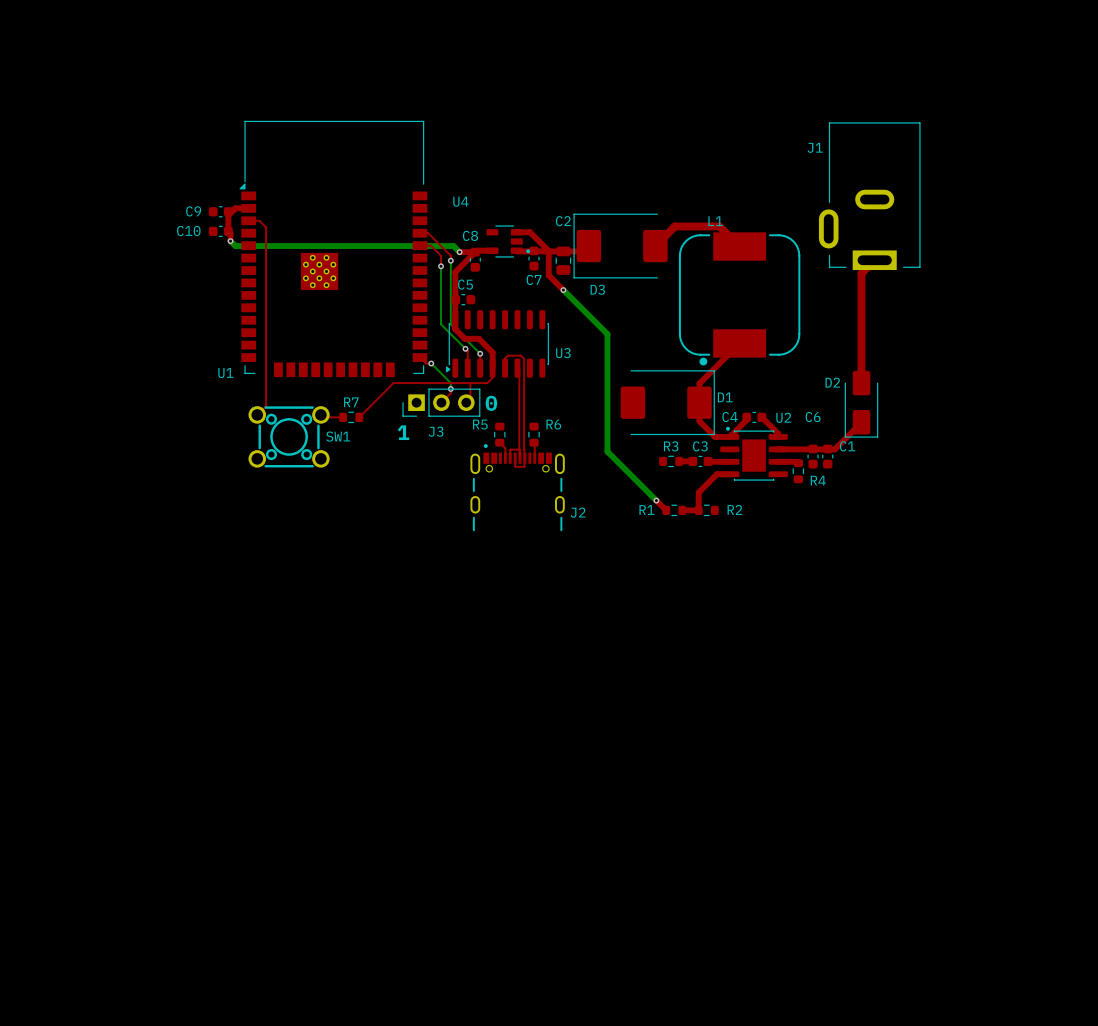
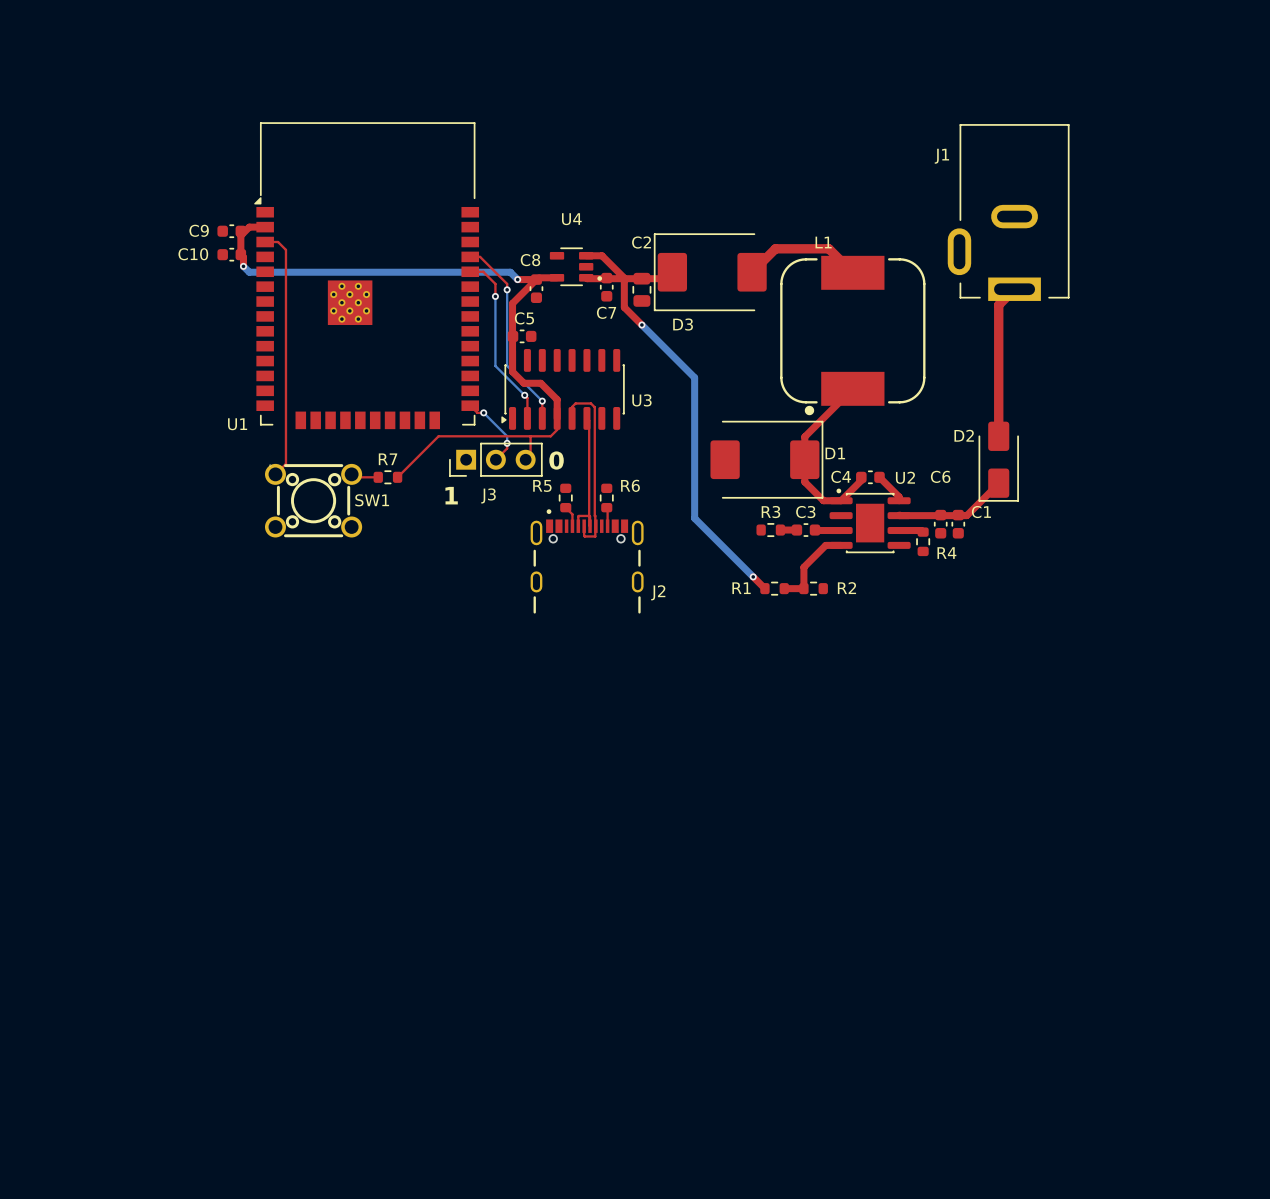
U4 name position: U4 (460, 201) -> U4 (571, 219)

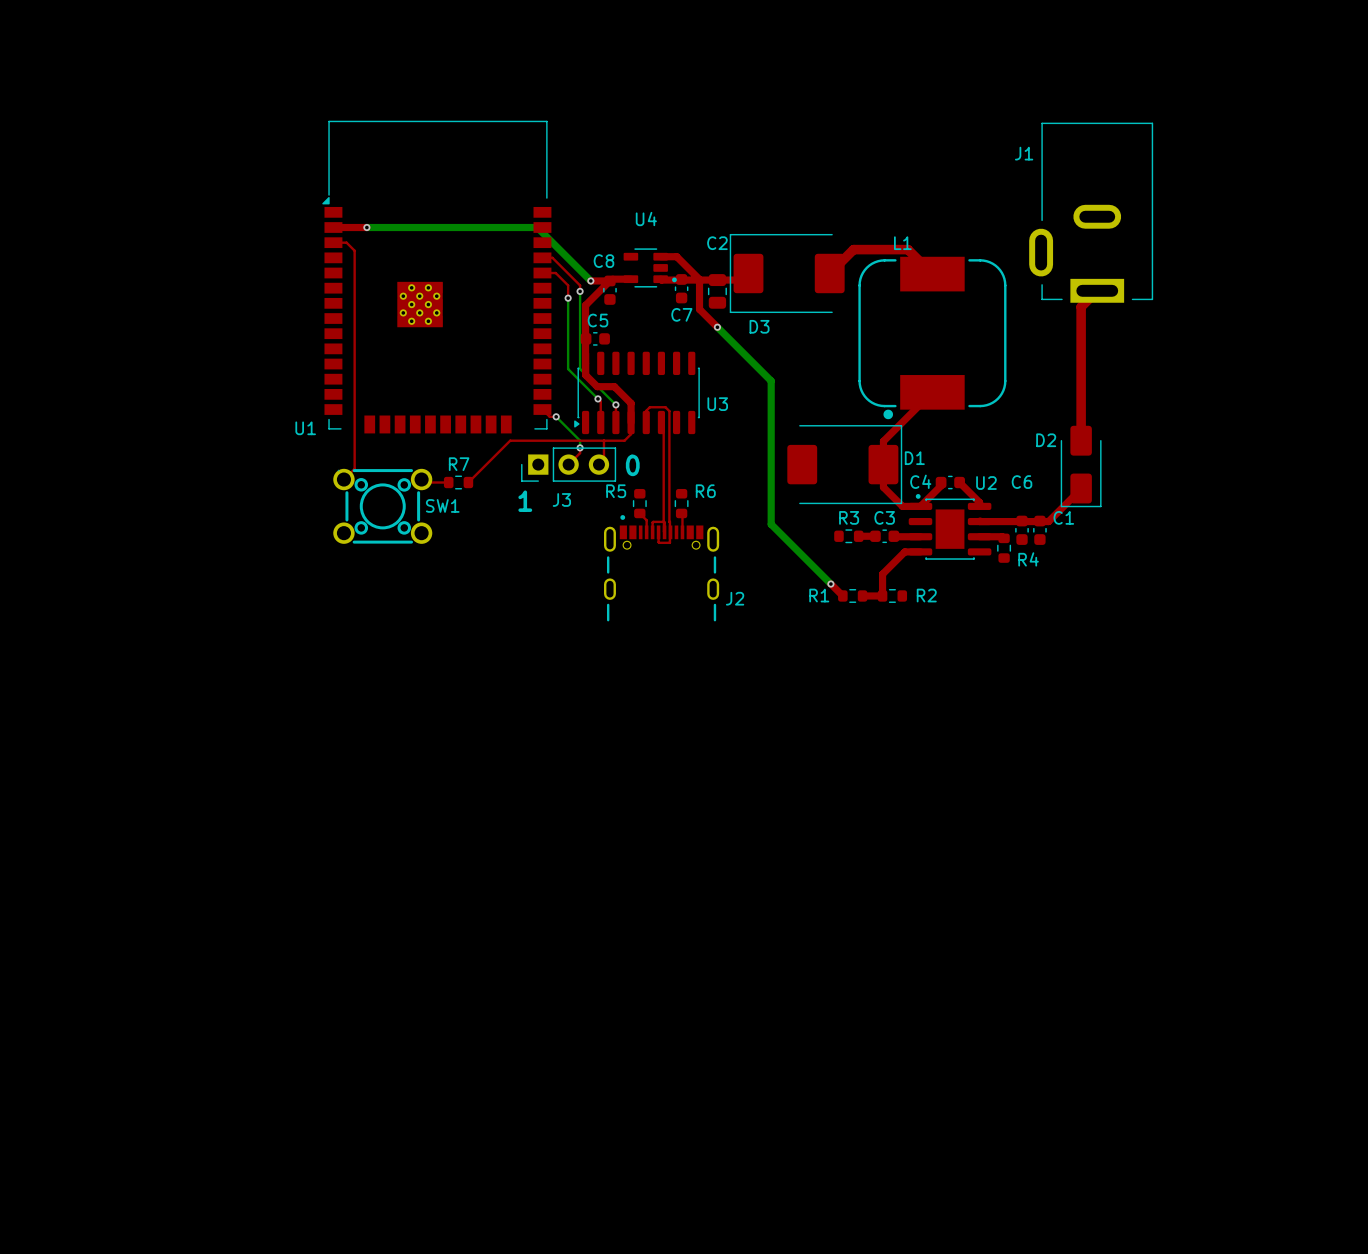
top track: (265, 227) (249, 227) (240, 235) (240, 254) (243, 257) (243, 266) -> (333, 227) (366, 227)
C9: (231, 231) -> none
C10: (231, 254) -> none
bottom track: (243, 266) (249, 272) (510, 272) -> (366, 227) (537, 227) (583, 273)
via position: (243, 266) -> (366, 227)

